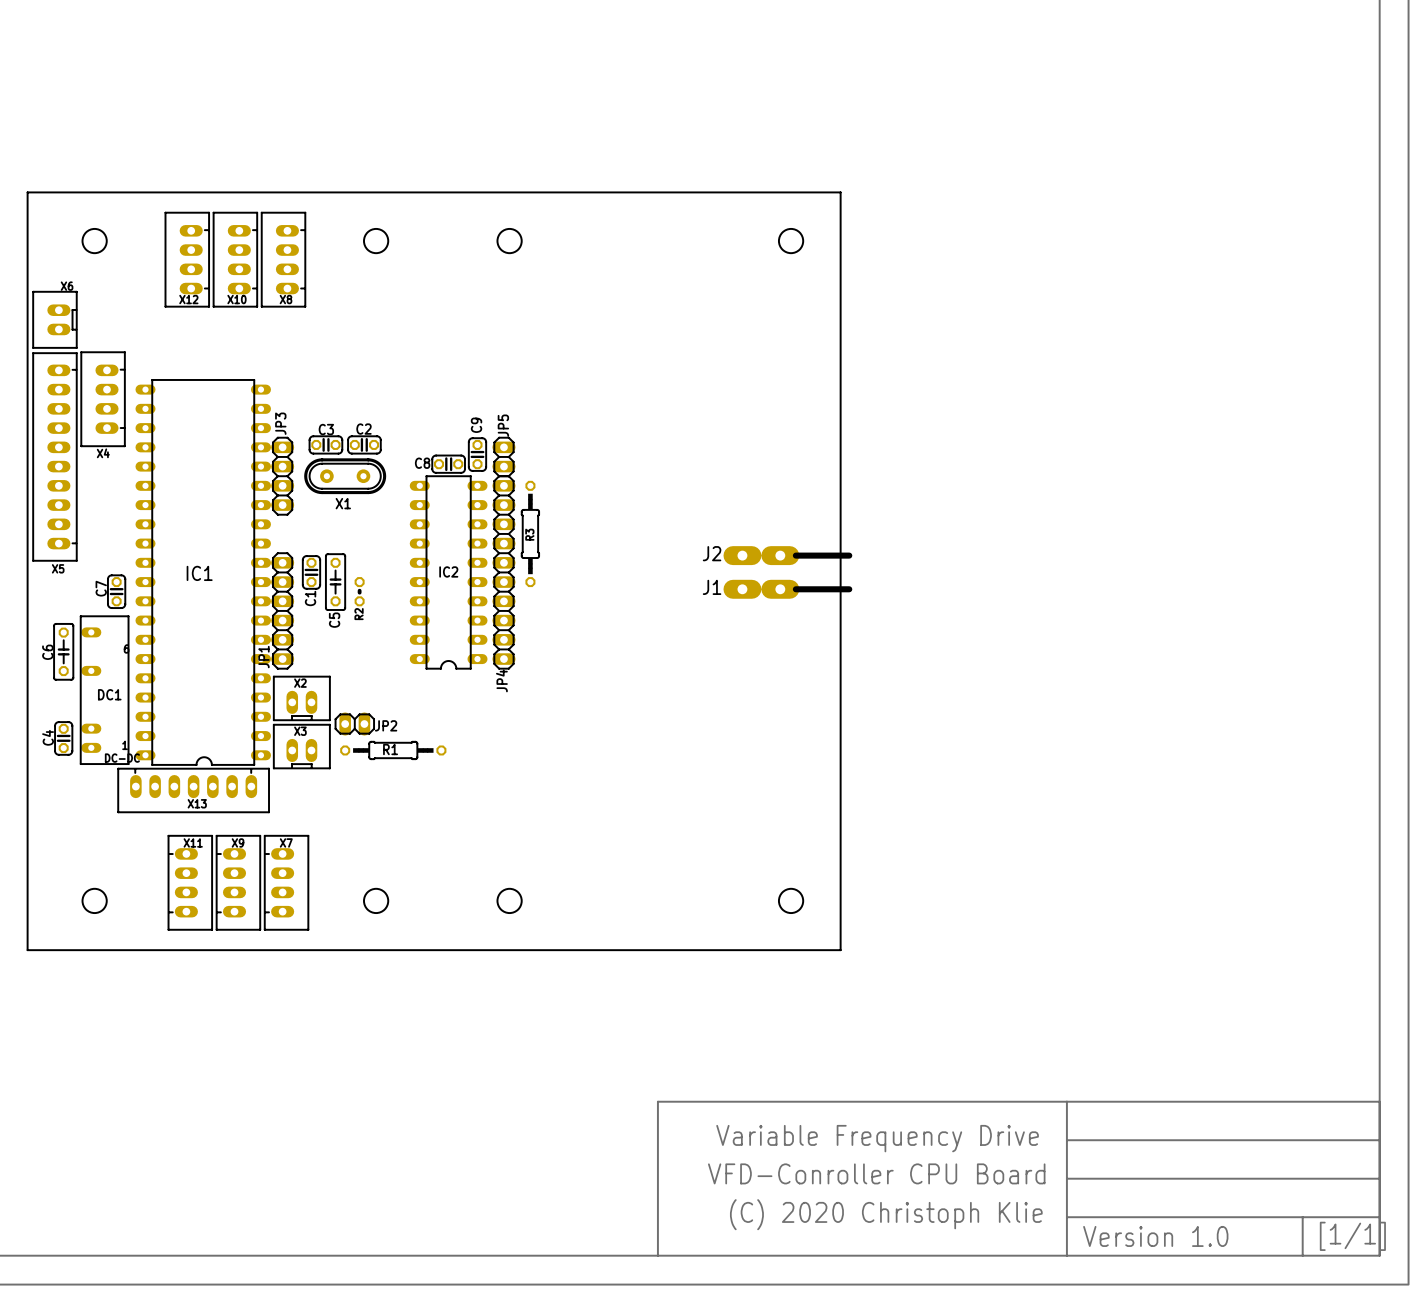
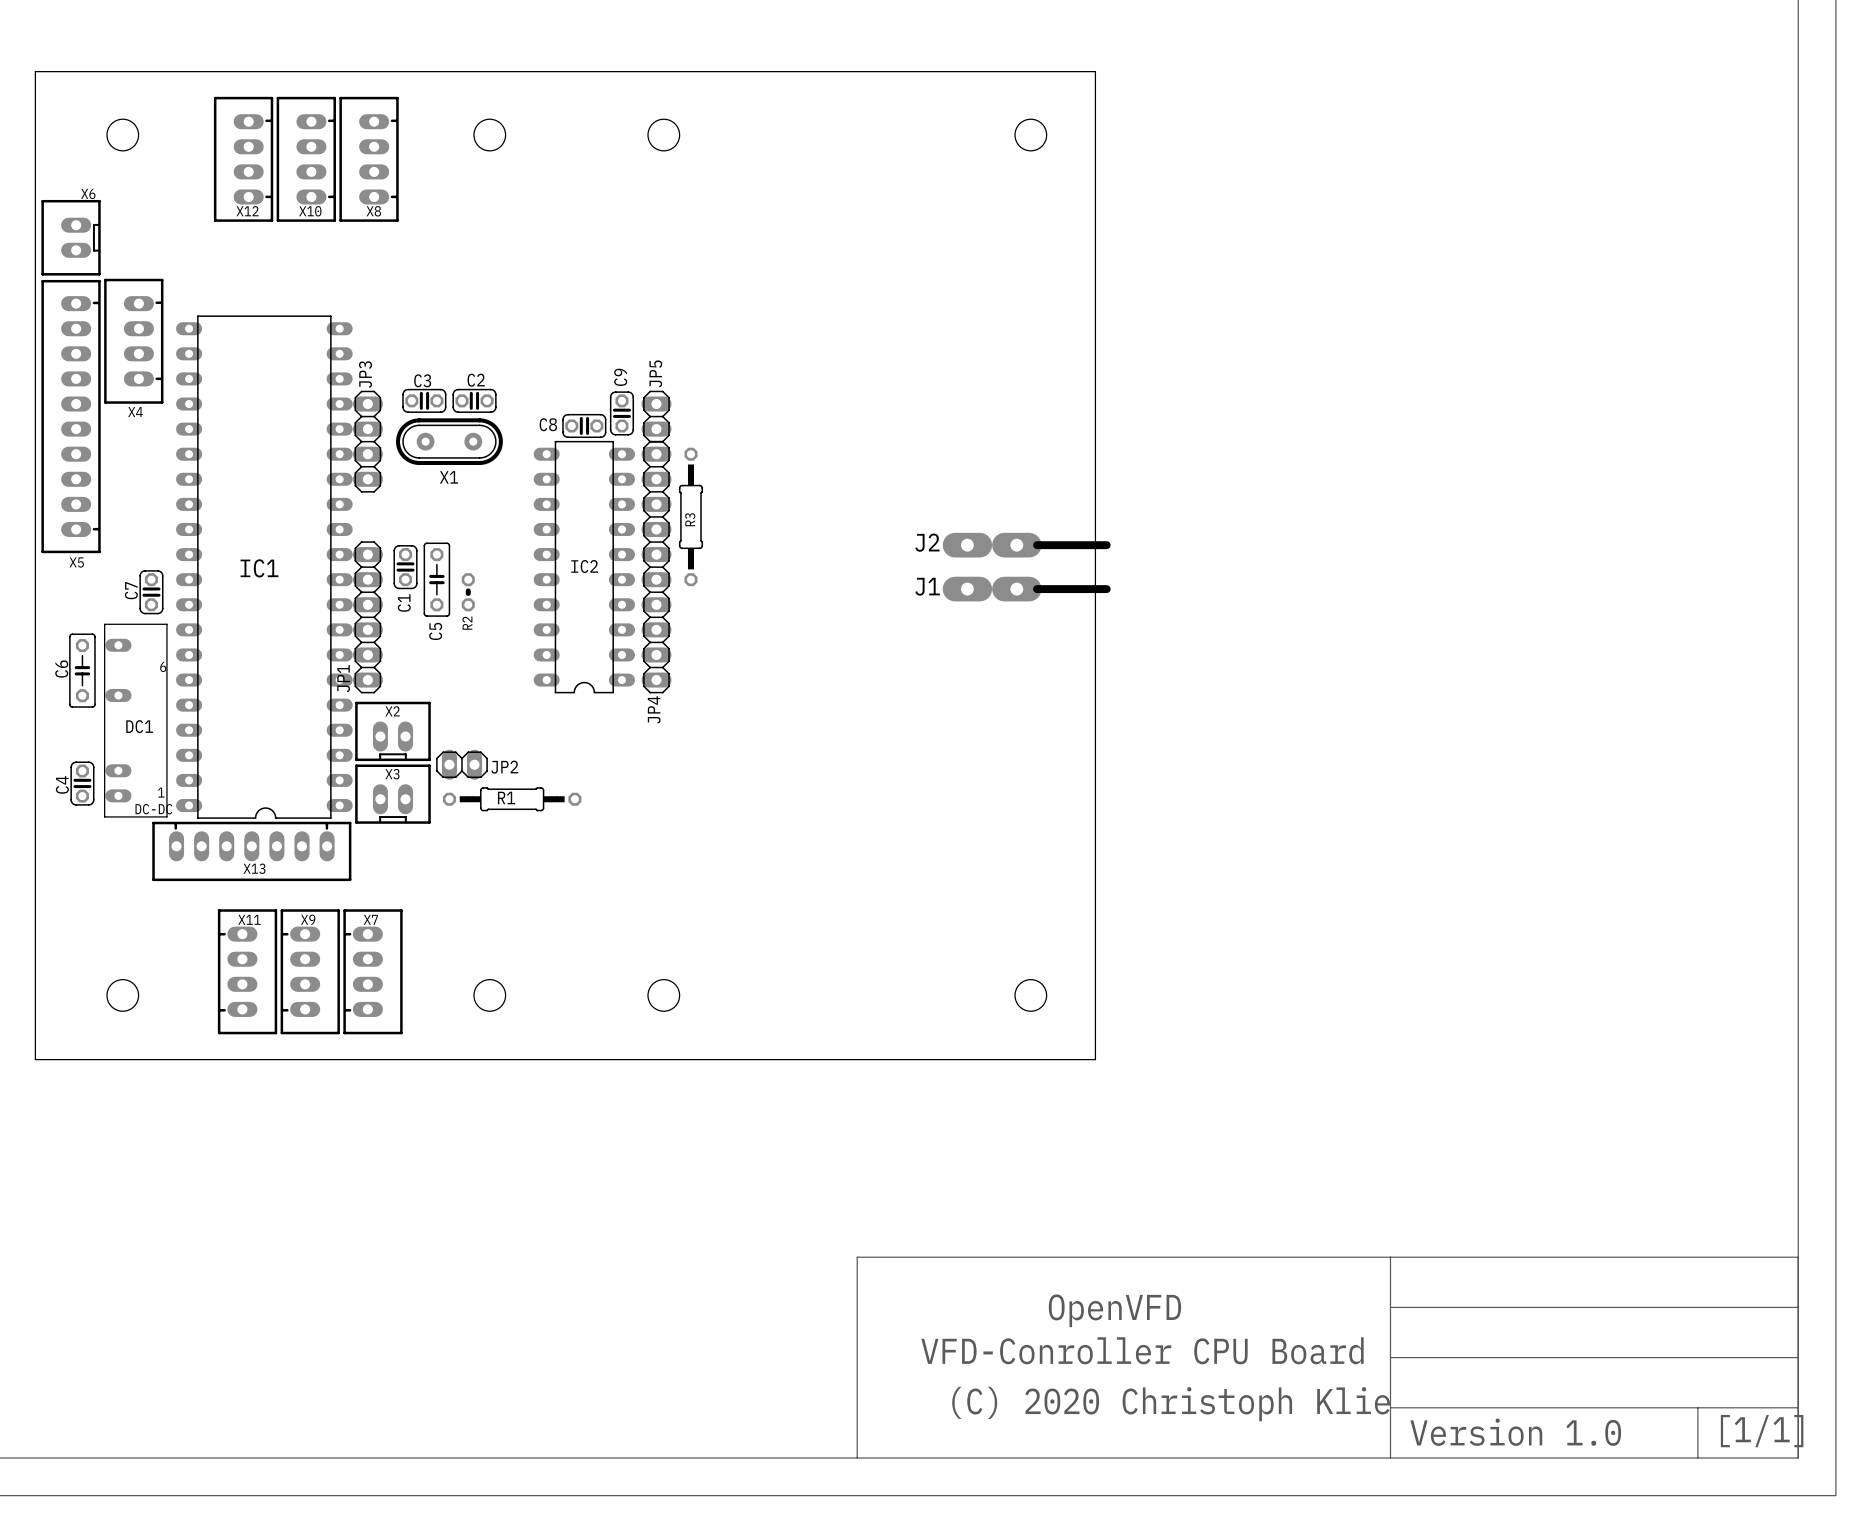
text: Variable Frequency Drive (877, 1138) -> none
text: none -> OpenVFD (1114, 1310)

